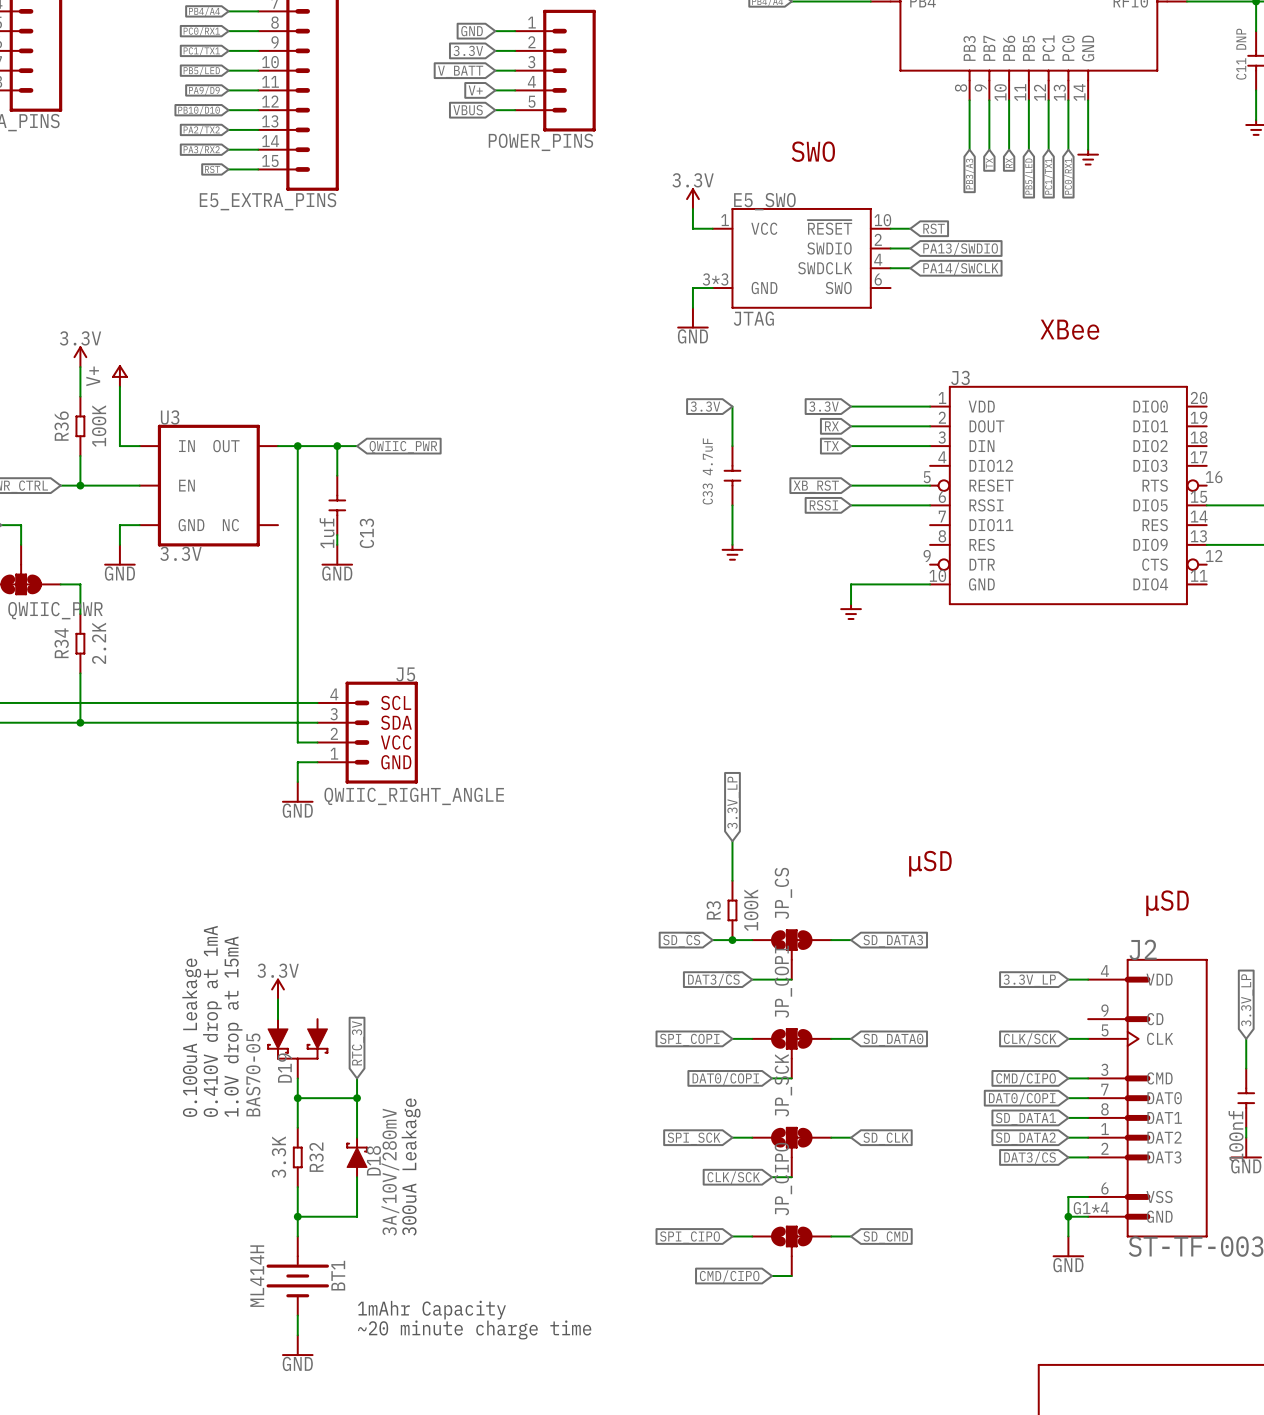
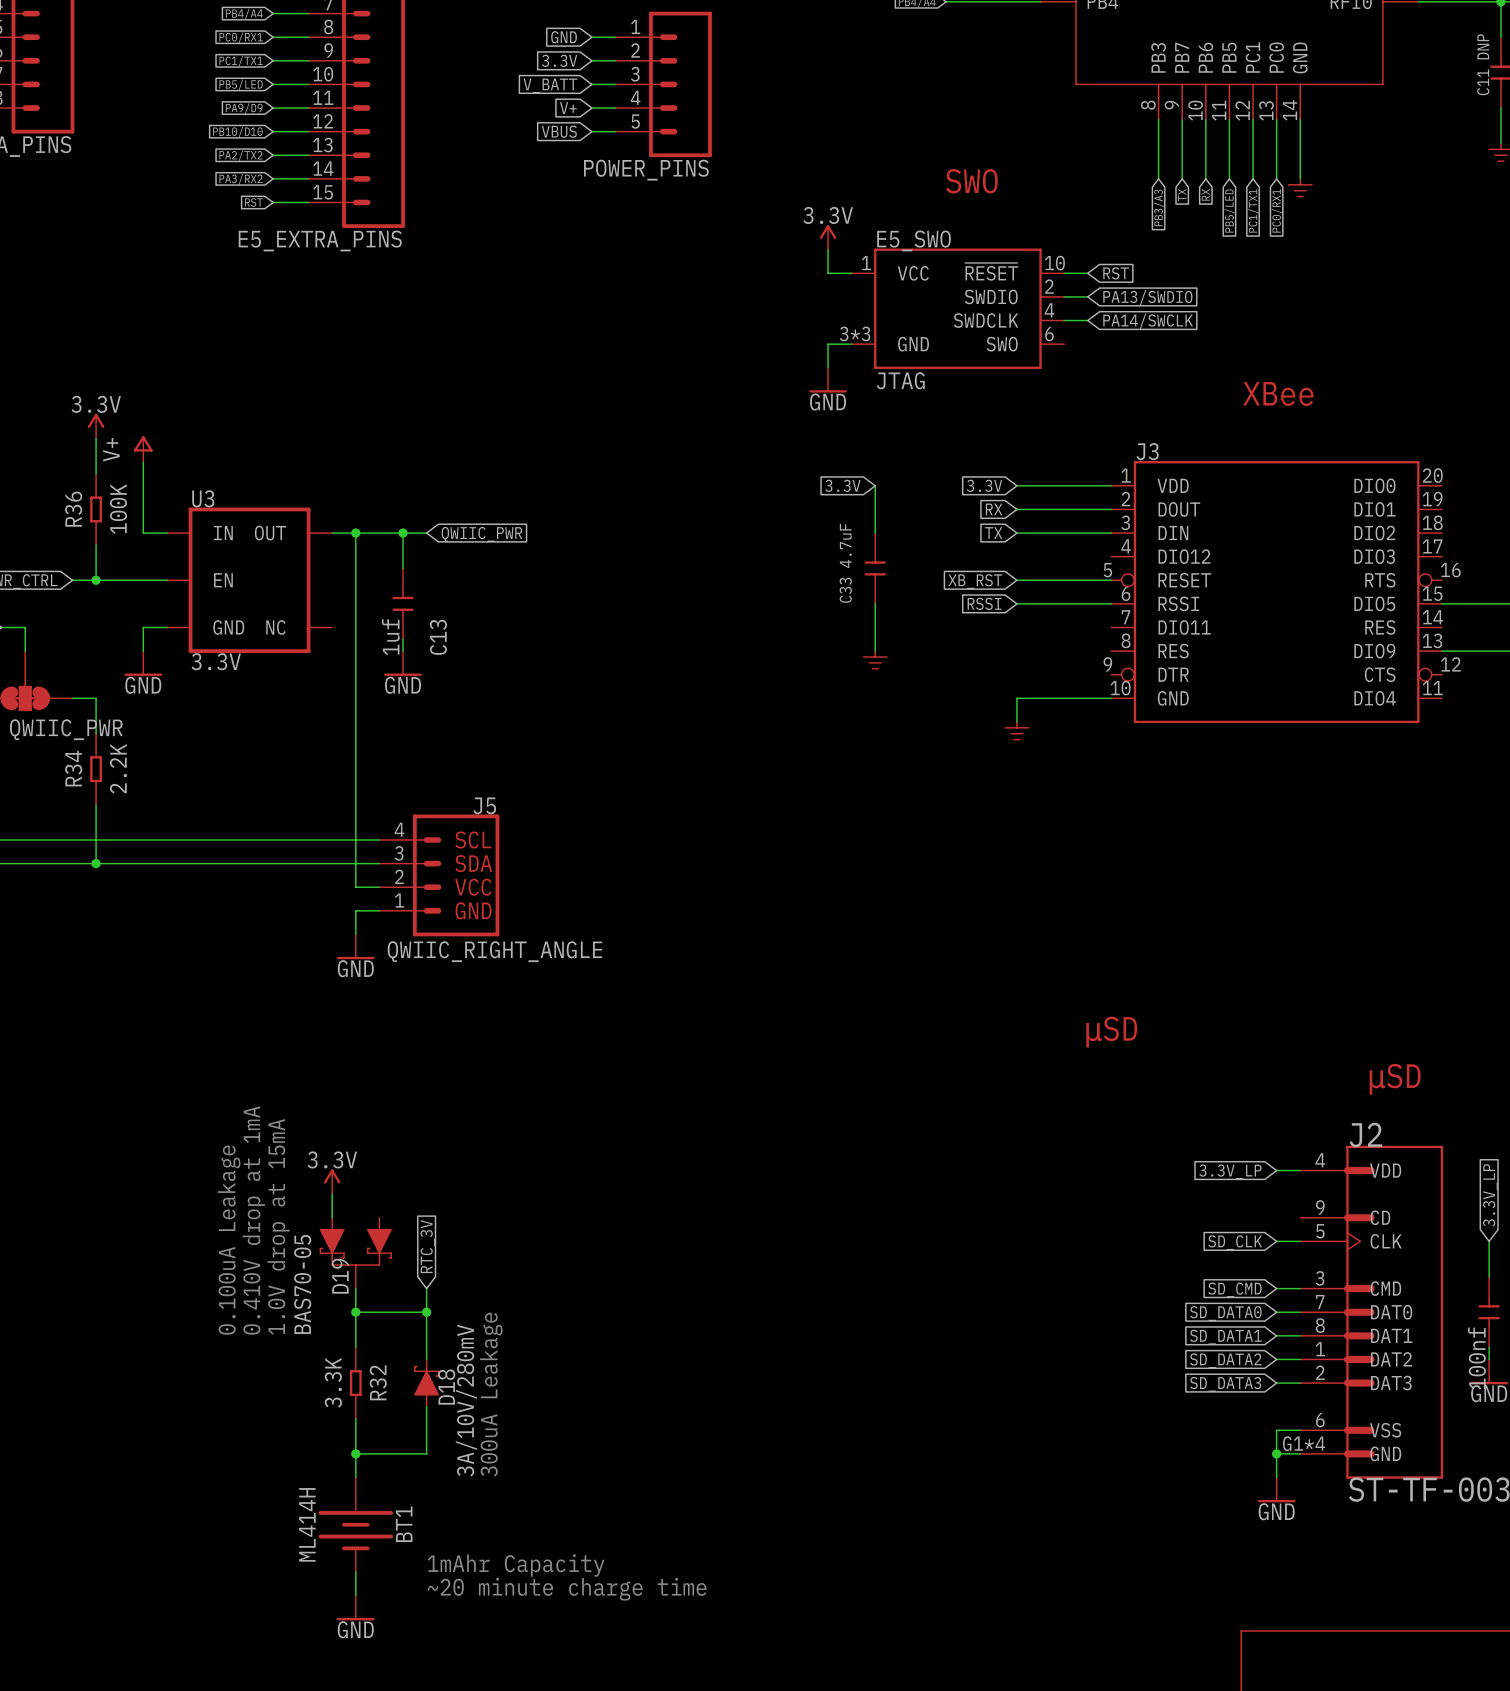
global label: 3.3V_LP (733, 802) -> none
wire: (732, 841) (732, 880) -> none
R3: 100K (732, 910) -> none
global label: SD_~{CS} (681, 940) -> none
wire: (712, 940) (752, 940) -> none
junction: (732, 940) -> none
wire: (831, 940) (851, 940) -> none
global label: SD_DATA3 (893, 941) -> none
JP_CS: (791, 954) -> none
global label: DAT3/~{CS} (713, 979) -> none
wire: (752, 979) (791, 979) -> none
wire: (732, 1038) (752, 1038) -> none
wire: (831, 1038) (851, 1038) -> none
global label: CLK/SCK (1030, 1039) -> SD_CLK (1235, 1242)
global label: SPI_COPI (689, 1040) -> none
global label: SD_DATA0 (893, 1040) -> none
JP_COPI: (791, 1053) -> none
global label: DAT0/COPI (725, 1078) -> none
wire: (772, 1078) (791, 1078) -> none
global label: CMD/CIPO (1026, 1078) -> SD_CMD (1235, 1289)
global label: DAT0/COPI (1022, 1098) -> SD_DATA0 (1225, 1313)
wire: (732, 1137) (752, 1137) -> none
wire: (831, 1137) (851, 1137) -> none
global label: SPI_SCK (694, 1138) -> none
global label: SD_CLK (885, 1138) -> none
JP_SCK: (791, 1152) -> none
global label: DAT3/~{CS} (1030, 1157) -> SD_DATA3 (1225, 1384)
global label: CLK/SCK (733, 1177) -> none
wire: (772, 1177) (791, 1177) -> none
wire: (732, 1236) (752, 1236) -> none
wire: (831, 1236) (851, 1236) -> none
global label: SPI_CIPO (689, 1237) -> none
global label: SD_CMD (885, 1237) -> none
JP_CIPO: (791, 1251) -> none
global label: CMD/CIPO (729, 1276) -> none
wire: (772, 1276) (791, 1276) -> none

